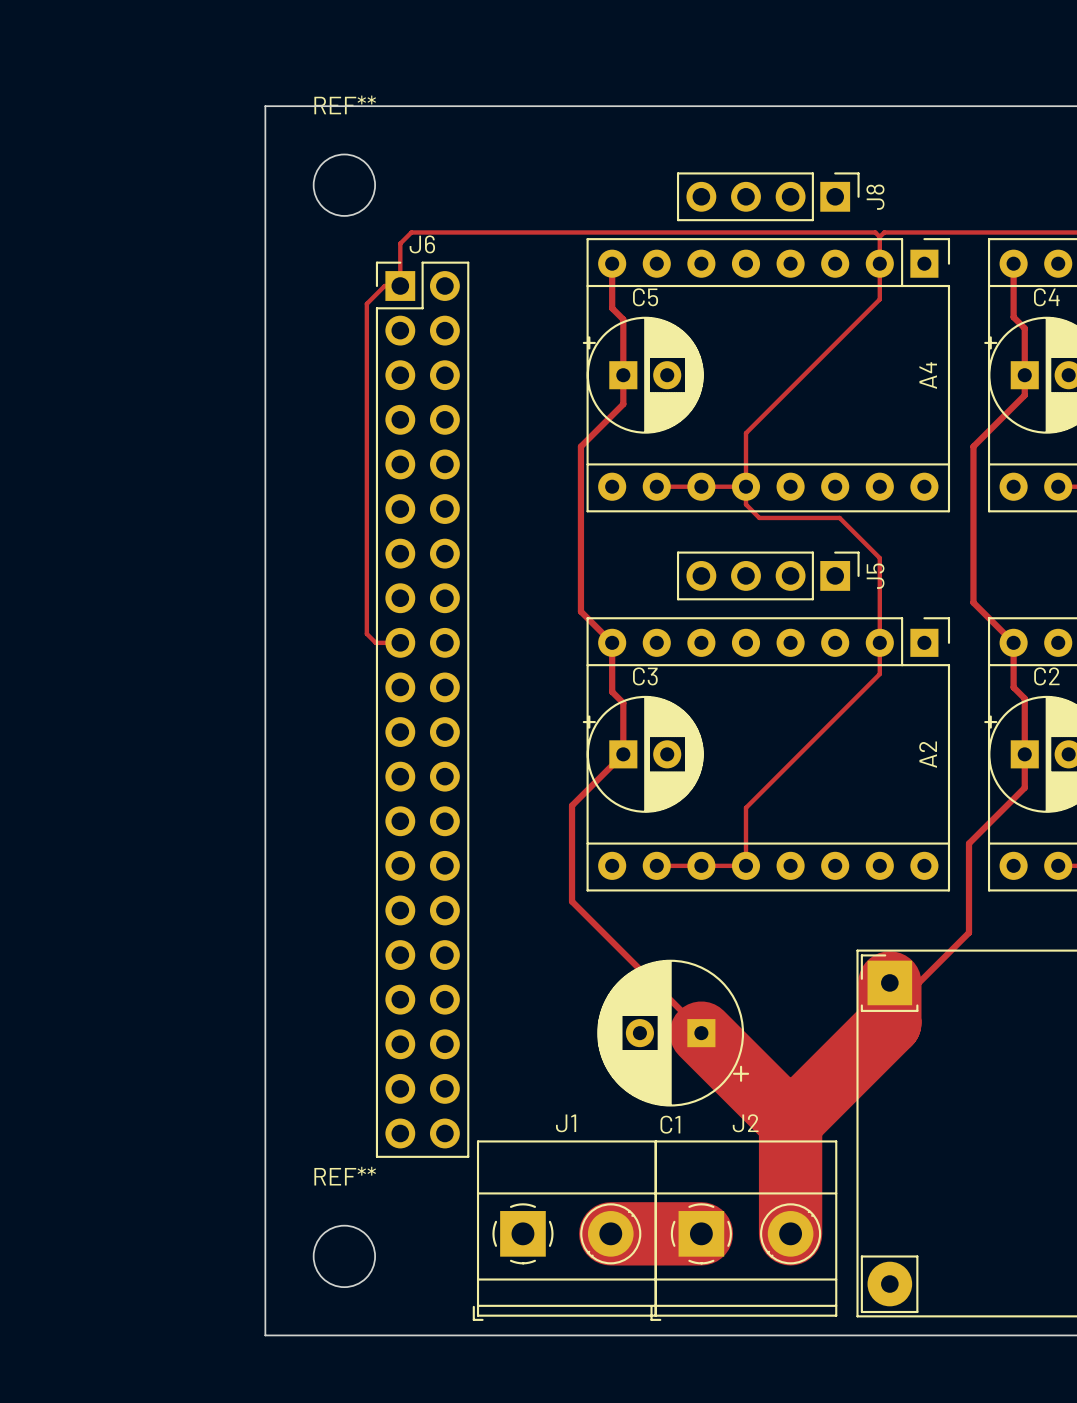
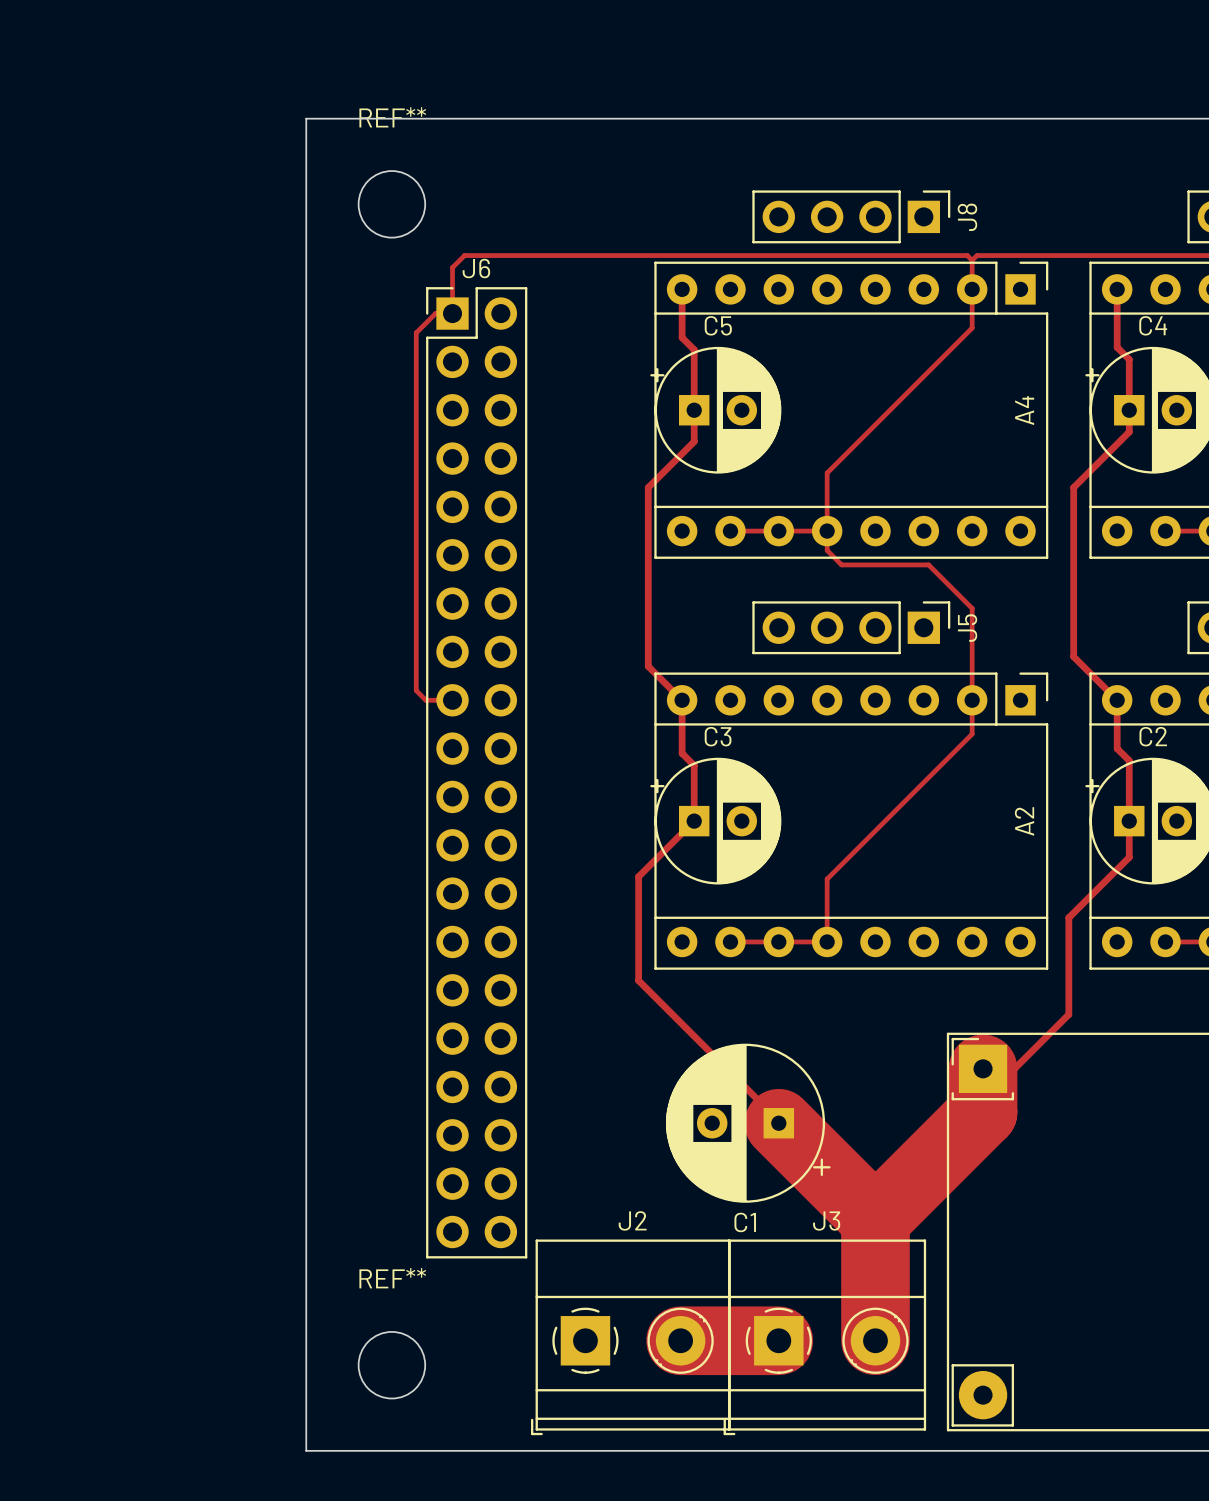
J1 name: J1 (566, 1123) -> J2 (632, 1220)
J2 name: J2 (745, 1123) -> J3 (826, 1221)

